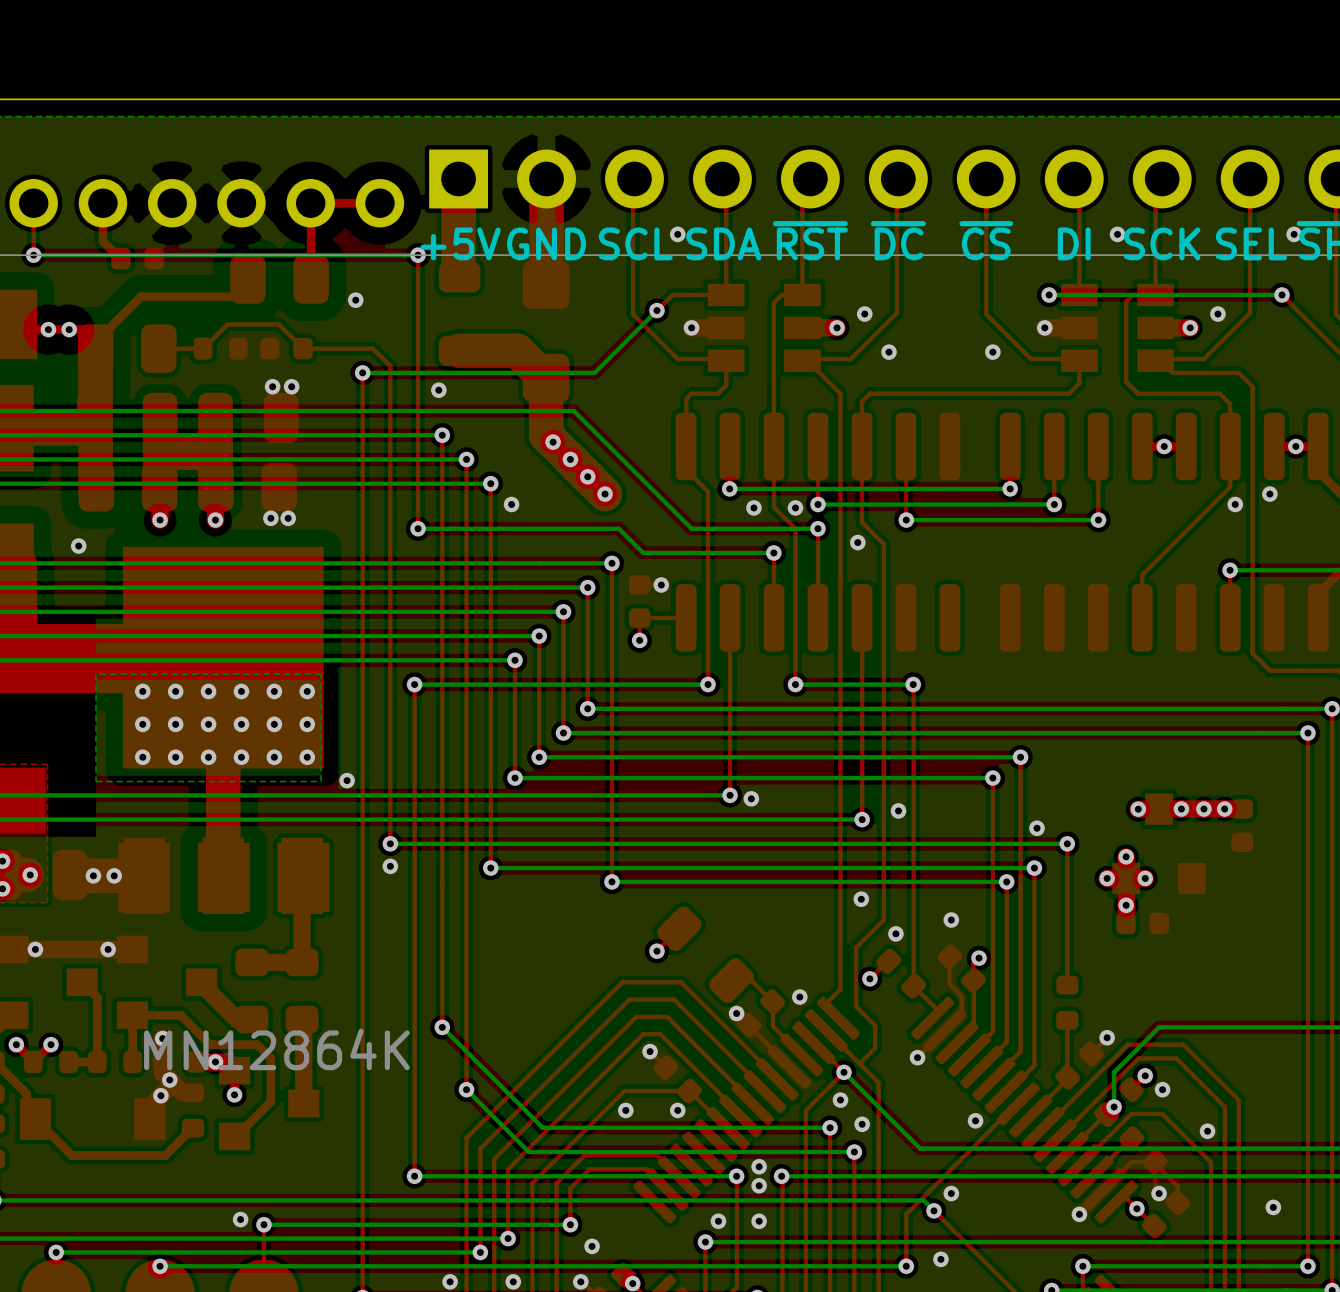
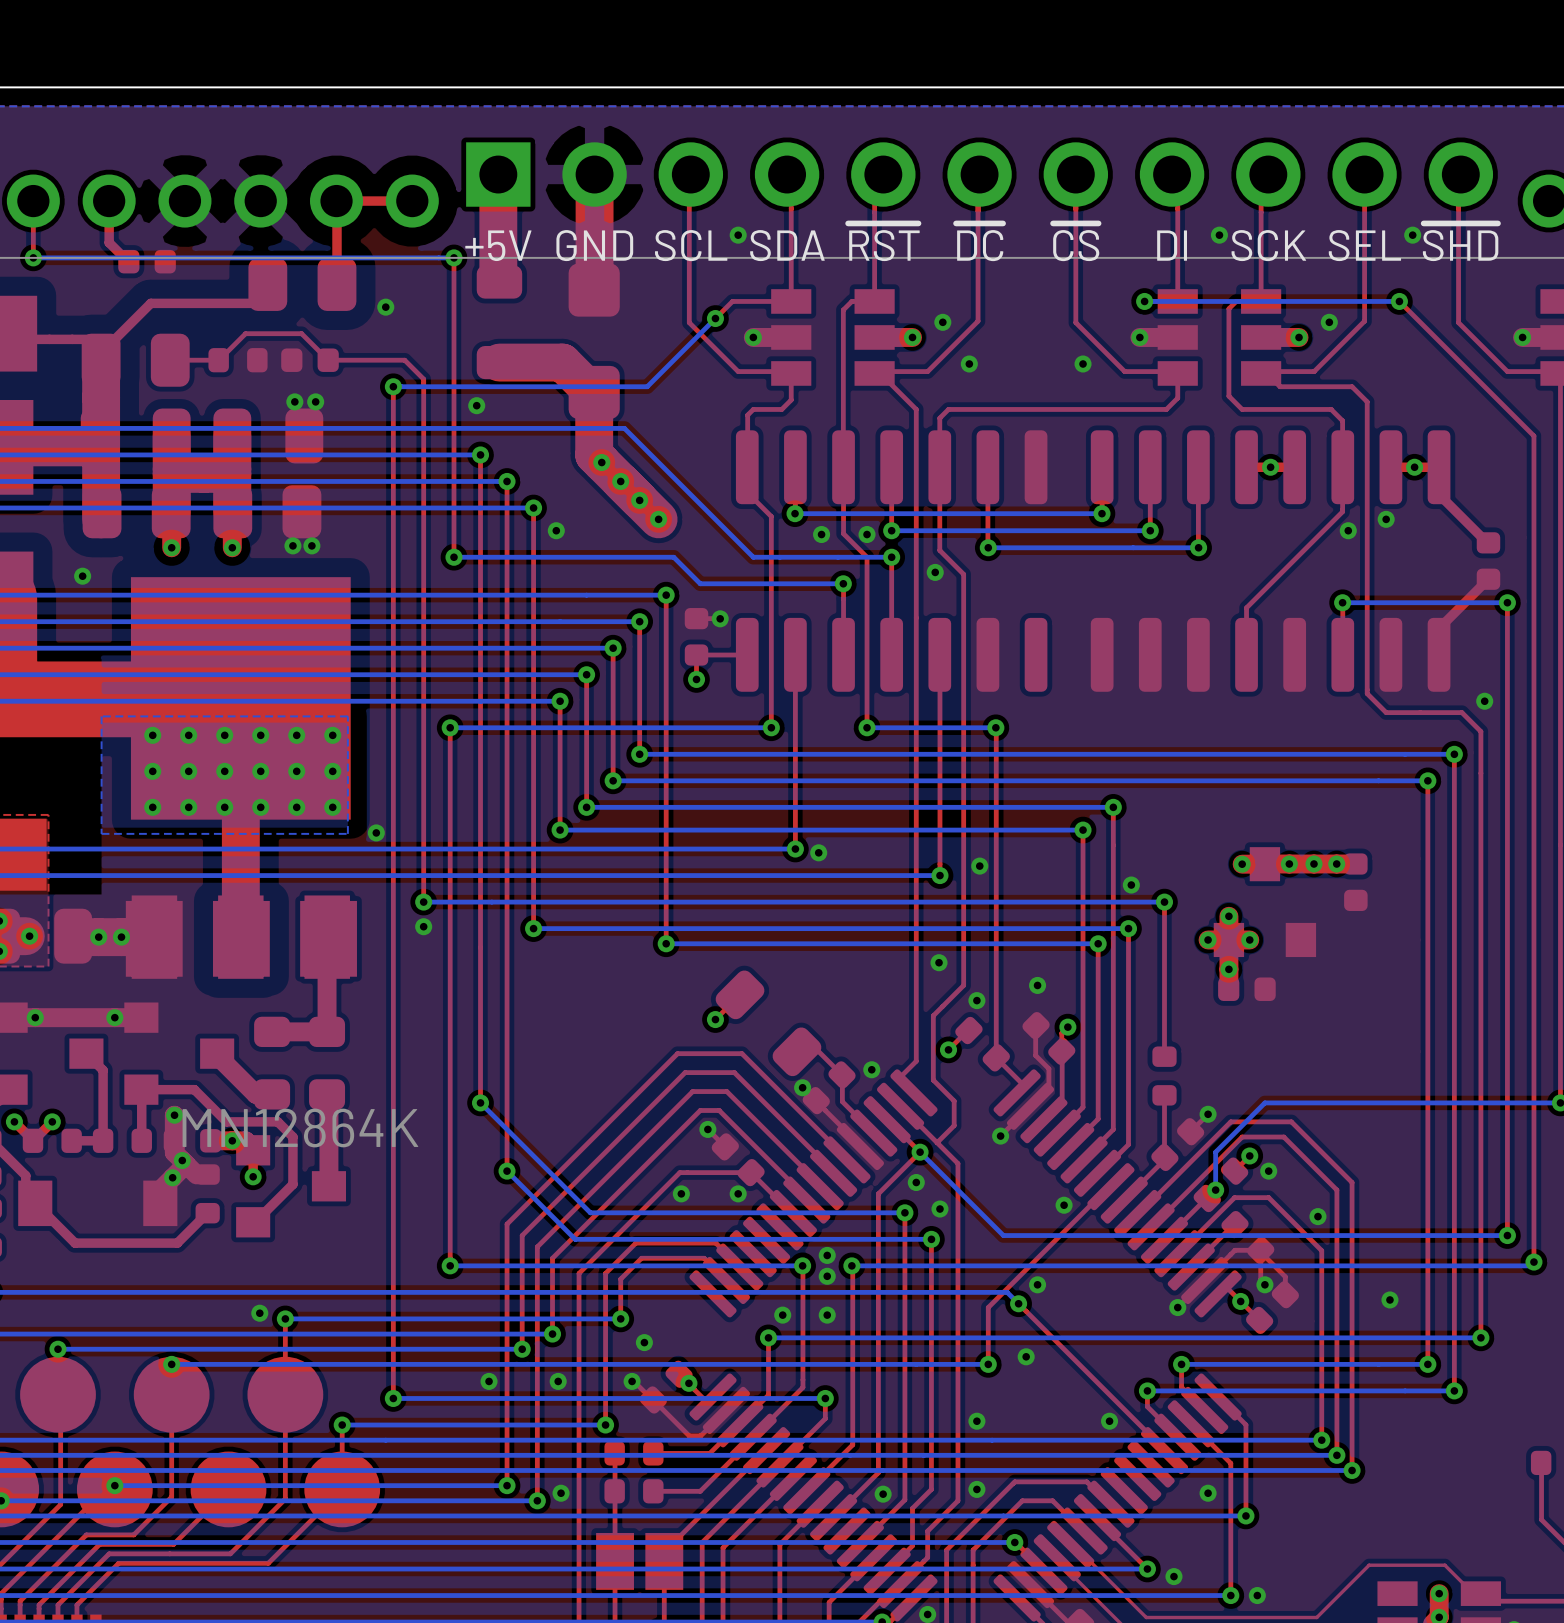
via: (48, 329) -> none
via: (69, 329) -> none

